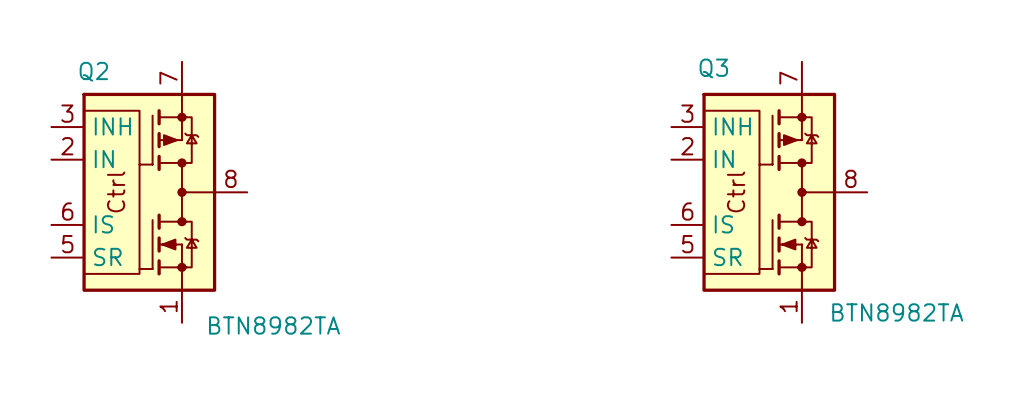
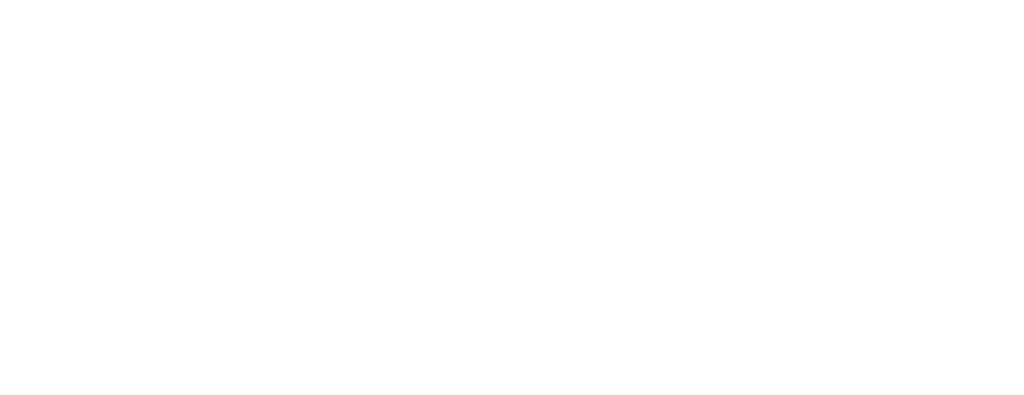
Q2: BTN8982TA (149, 192) -> none
Q3: BTN8982TA (769, 192) -> none

